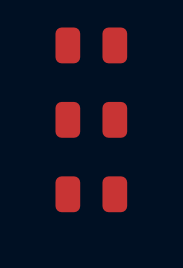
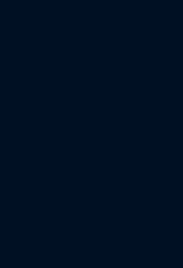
part: (91, 45) -> none
part: (91, 119) -> none
part: (91, 194) -> none

